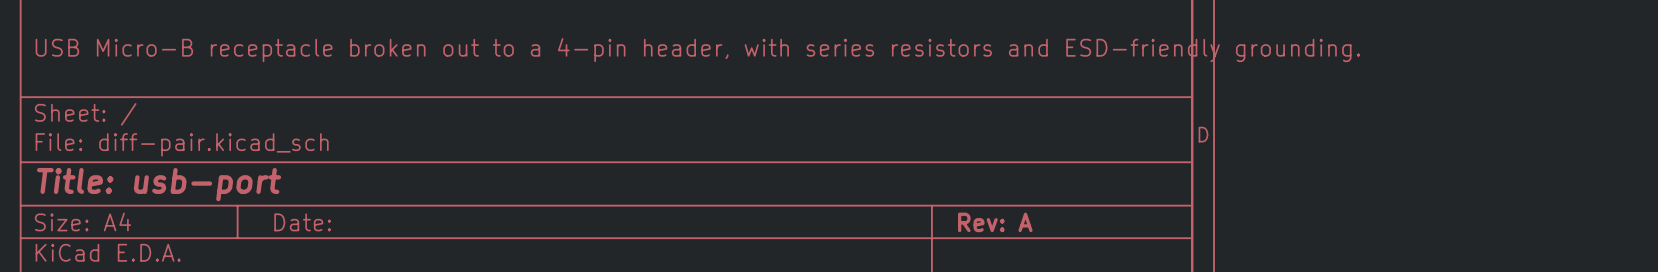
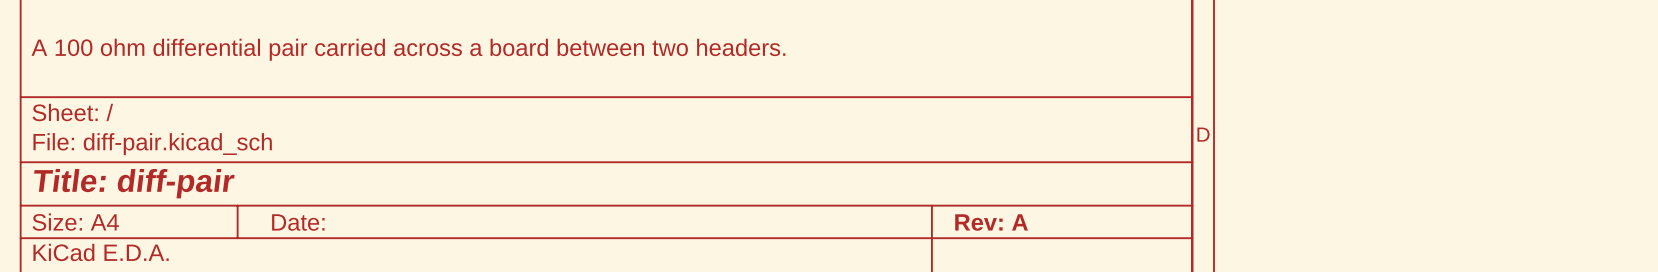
title block: USB Micro-B receptacle broken out to a 4-pin header, with series resistors and ESD-friendly grounding. (697, 50) -> A 100 ohm differential pair carried across a board between two headers. (408, 49)
title block: Title: usb-port (159, 184) -> Title: diff-pair (134, 183)

